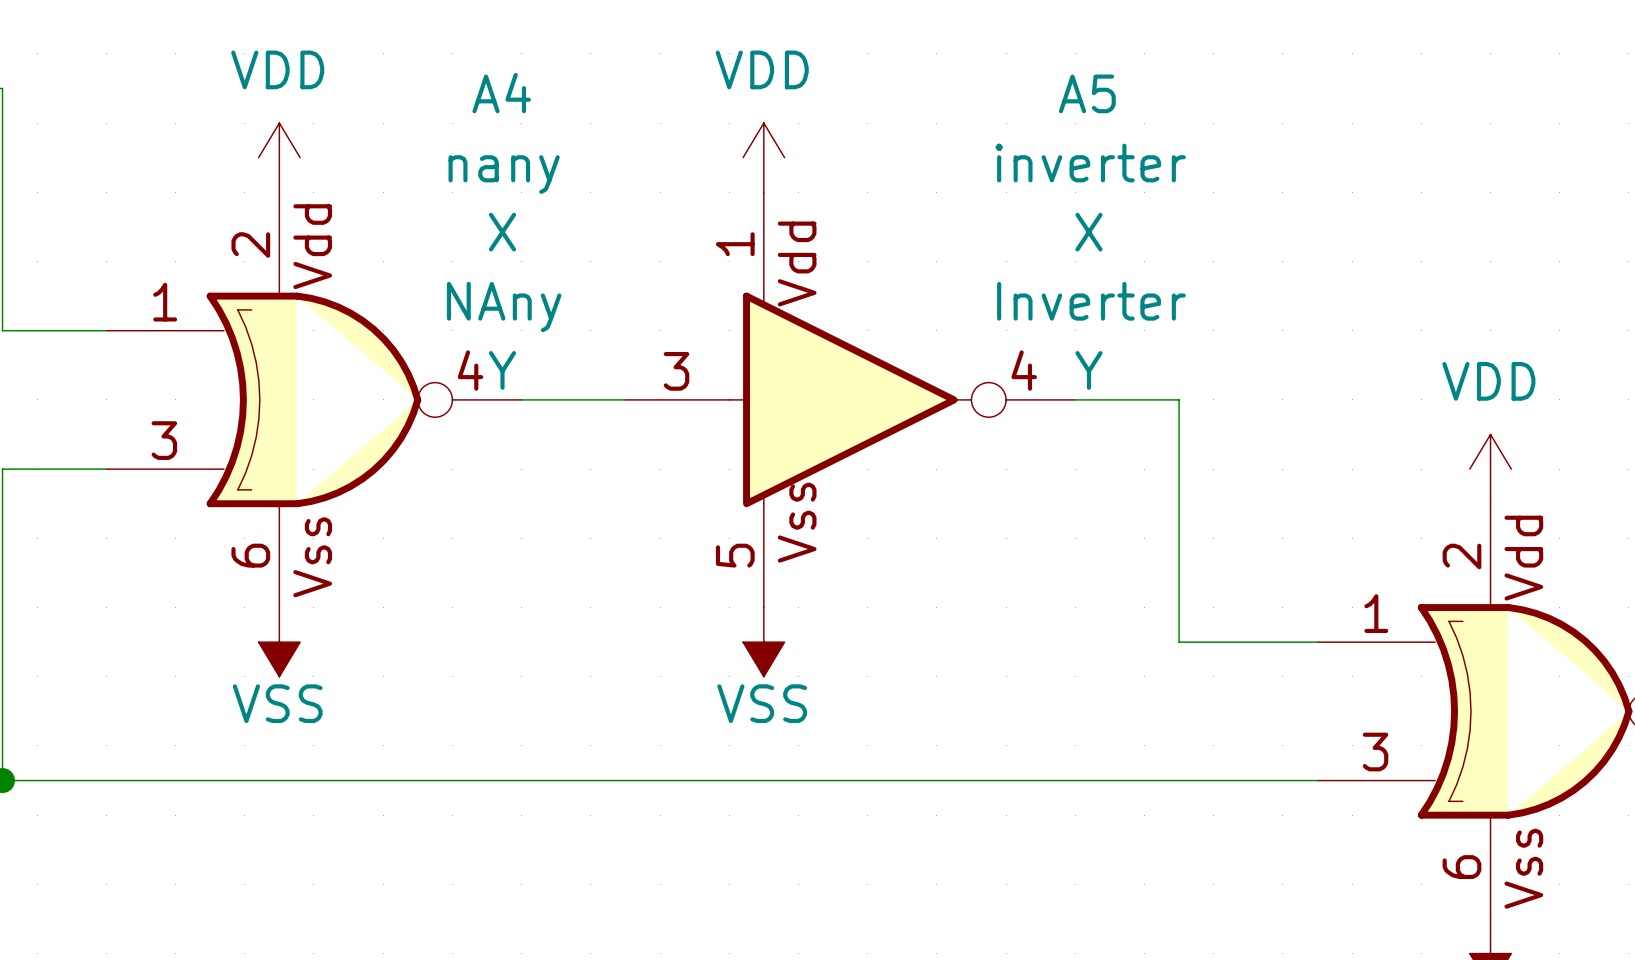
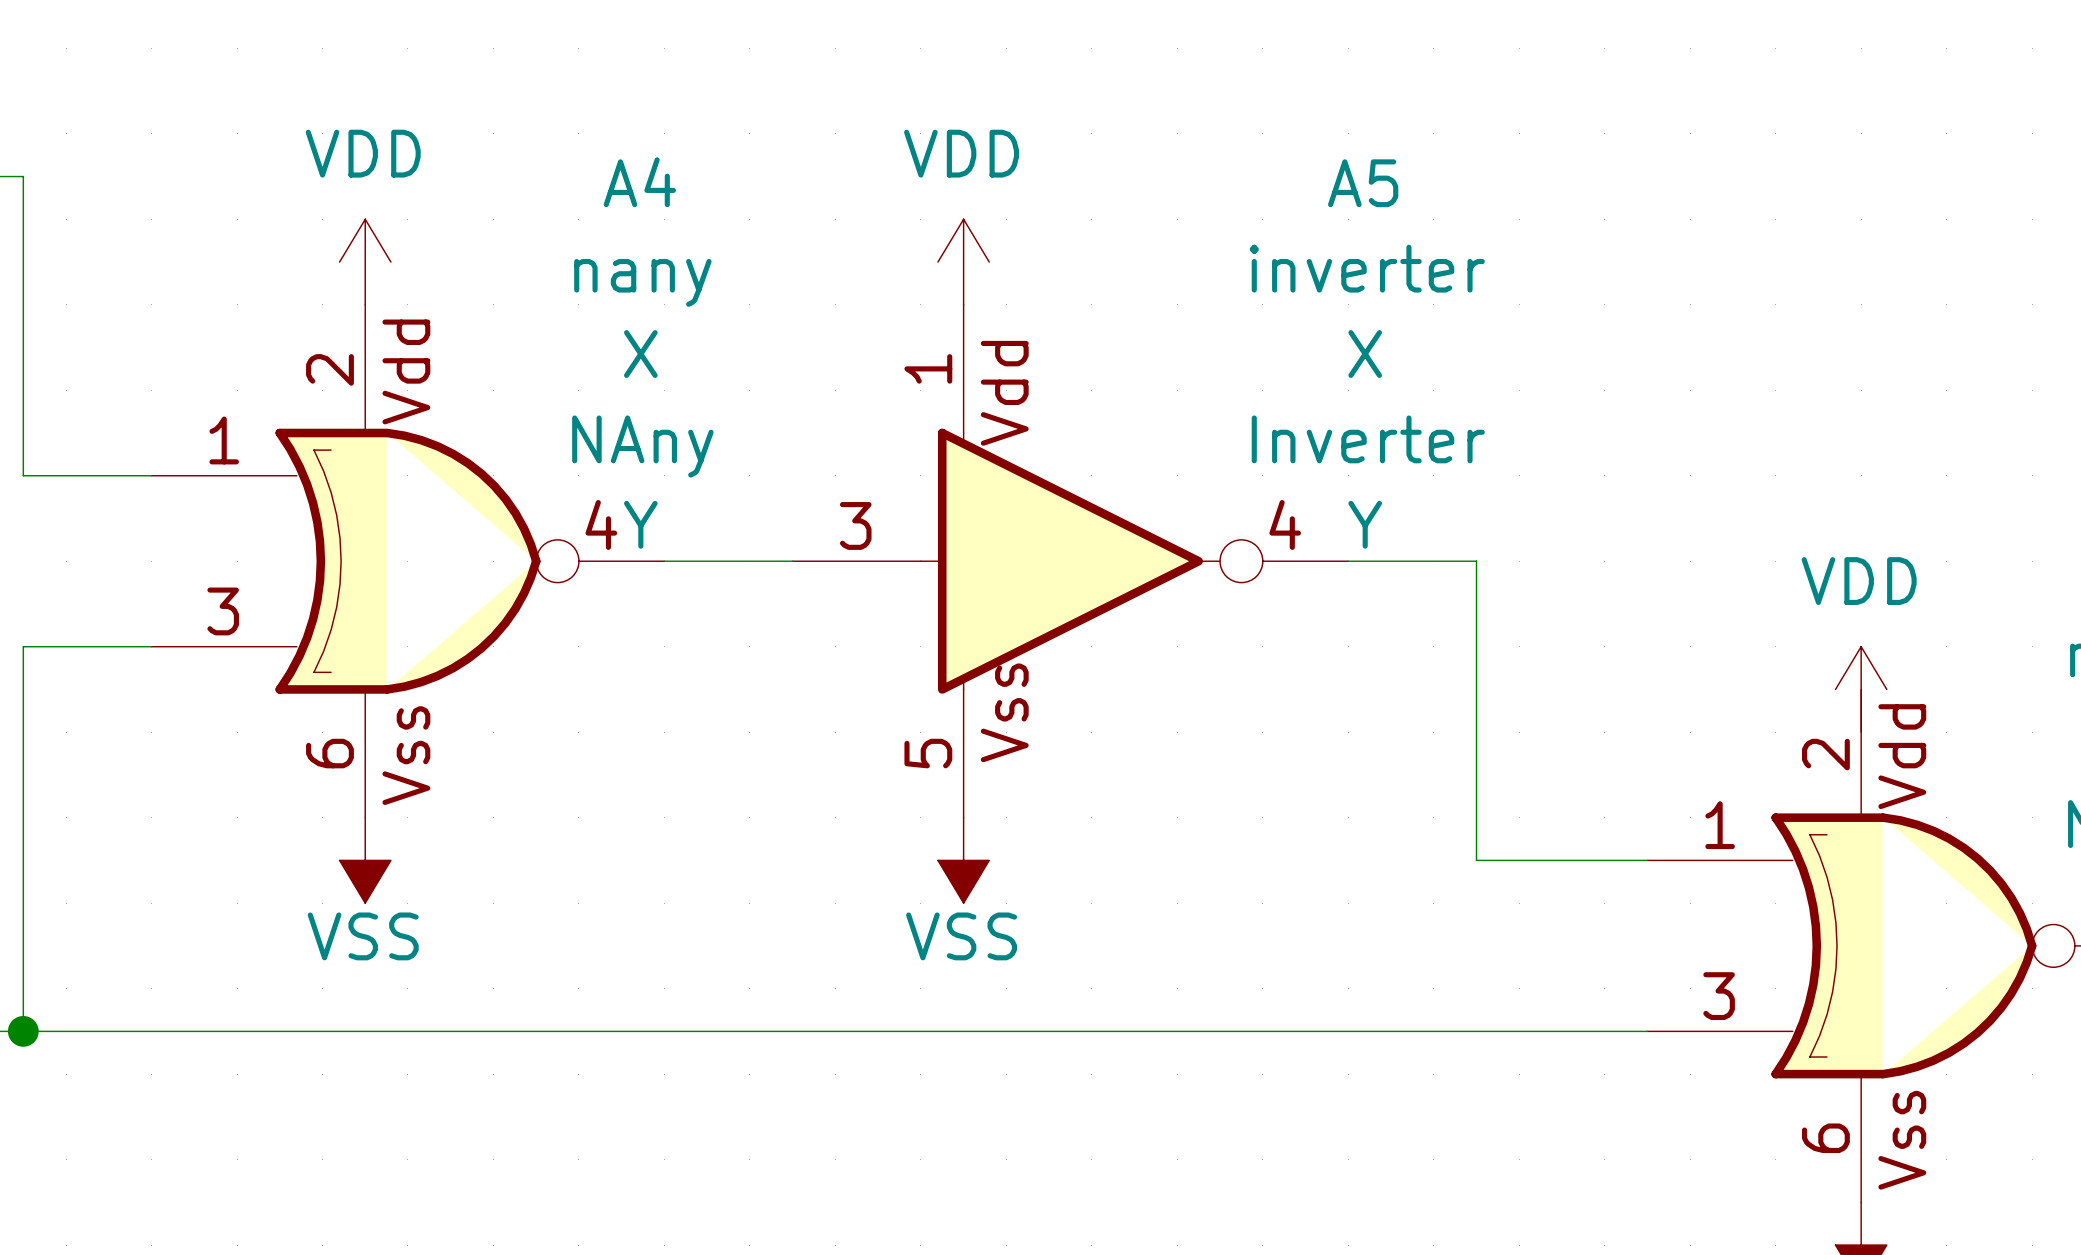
power symbol position: VDD (1490, 469) -> VDD (1861, 689)

